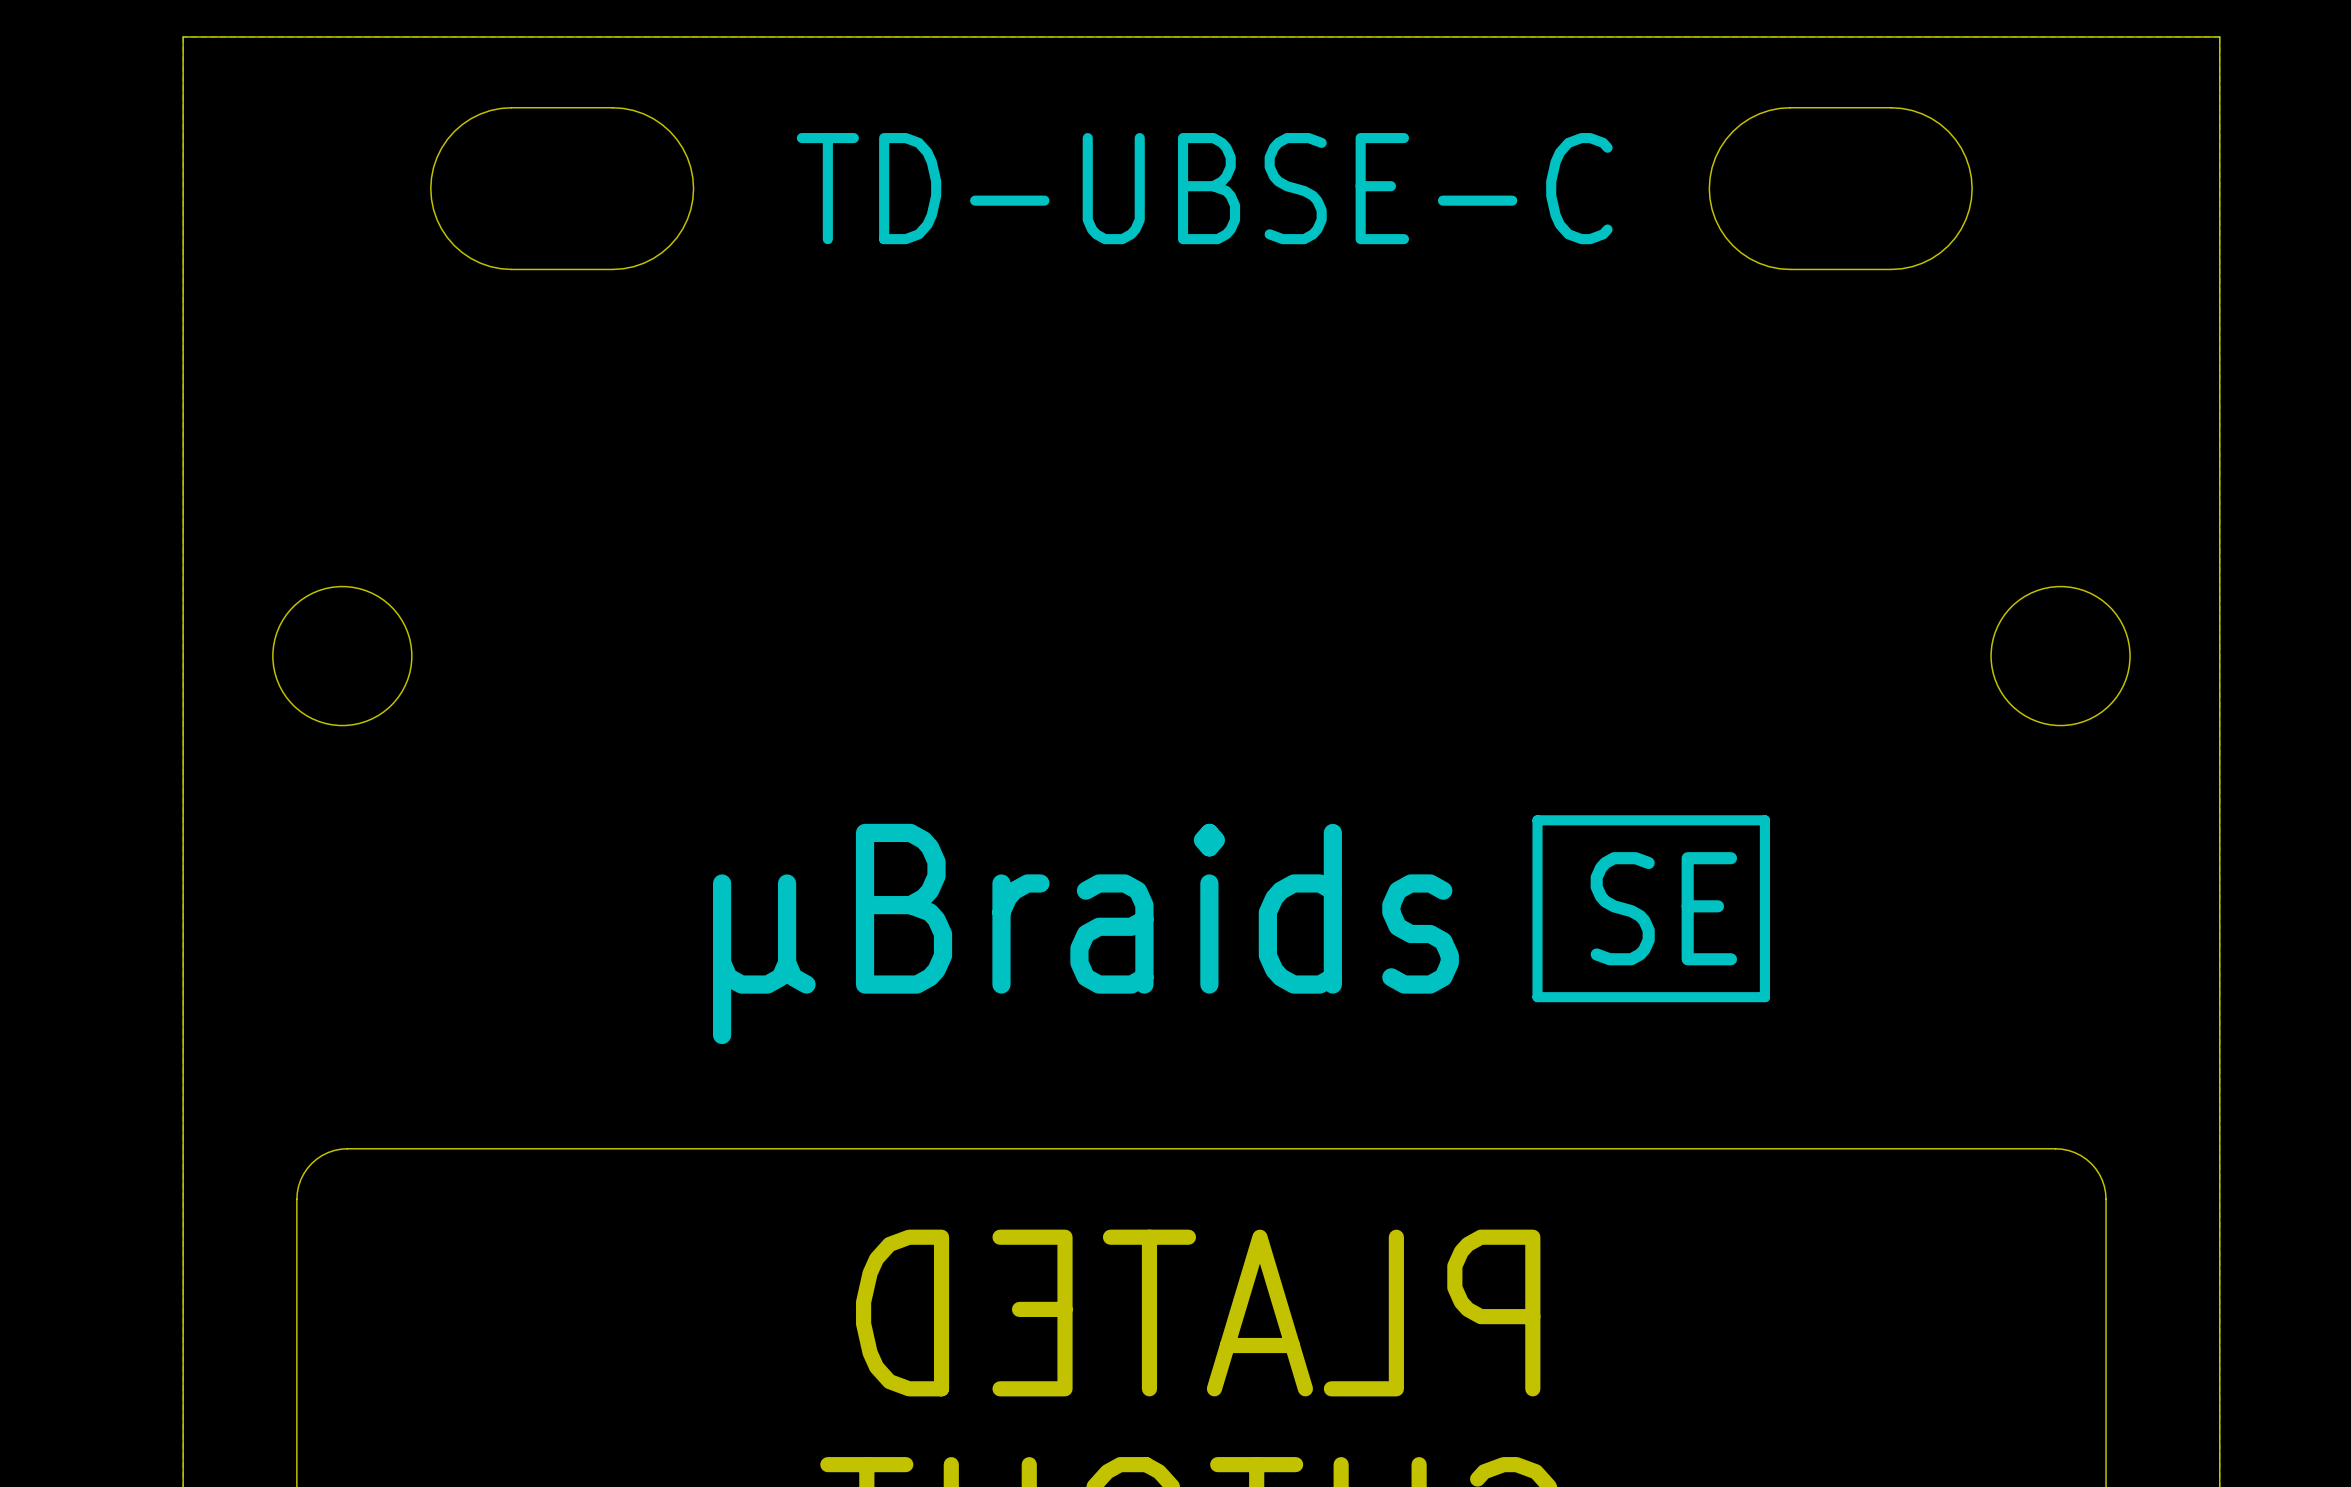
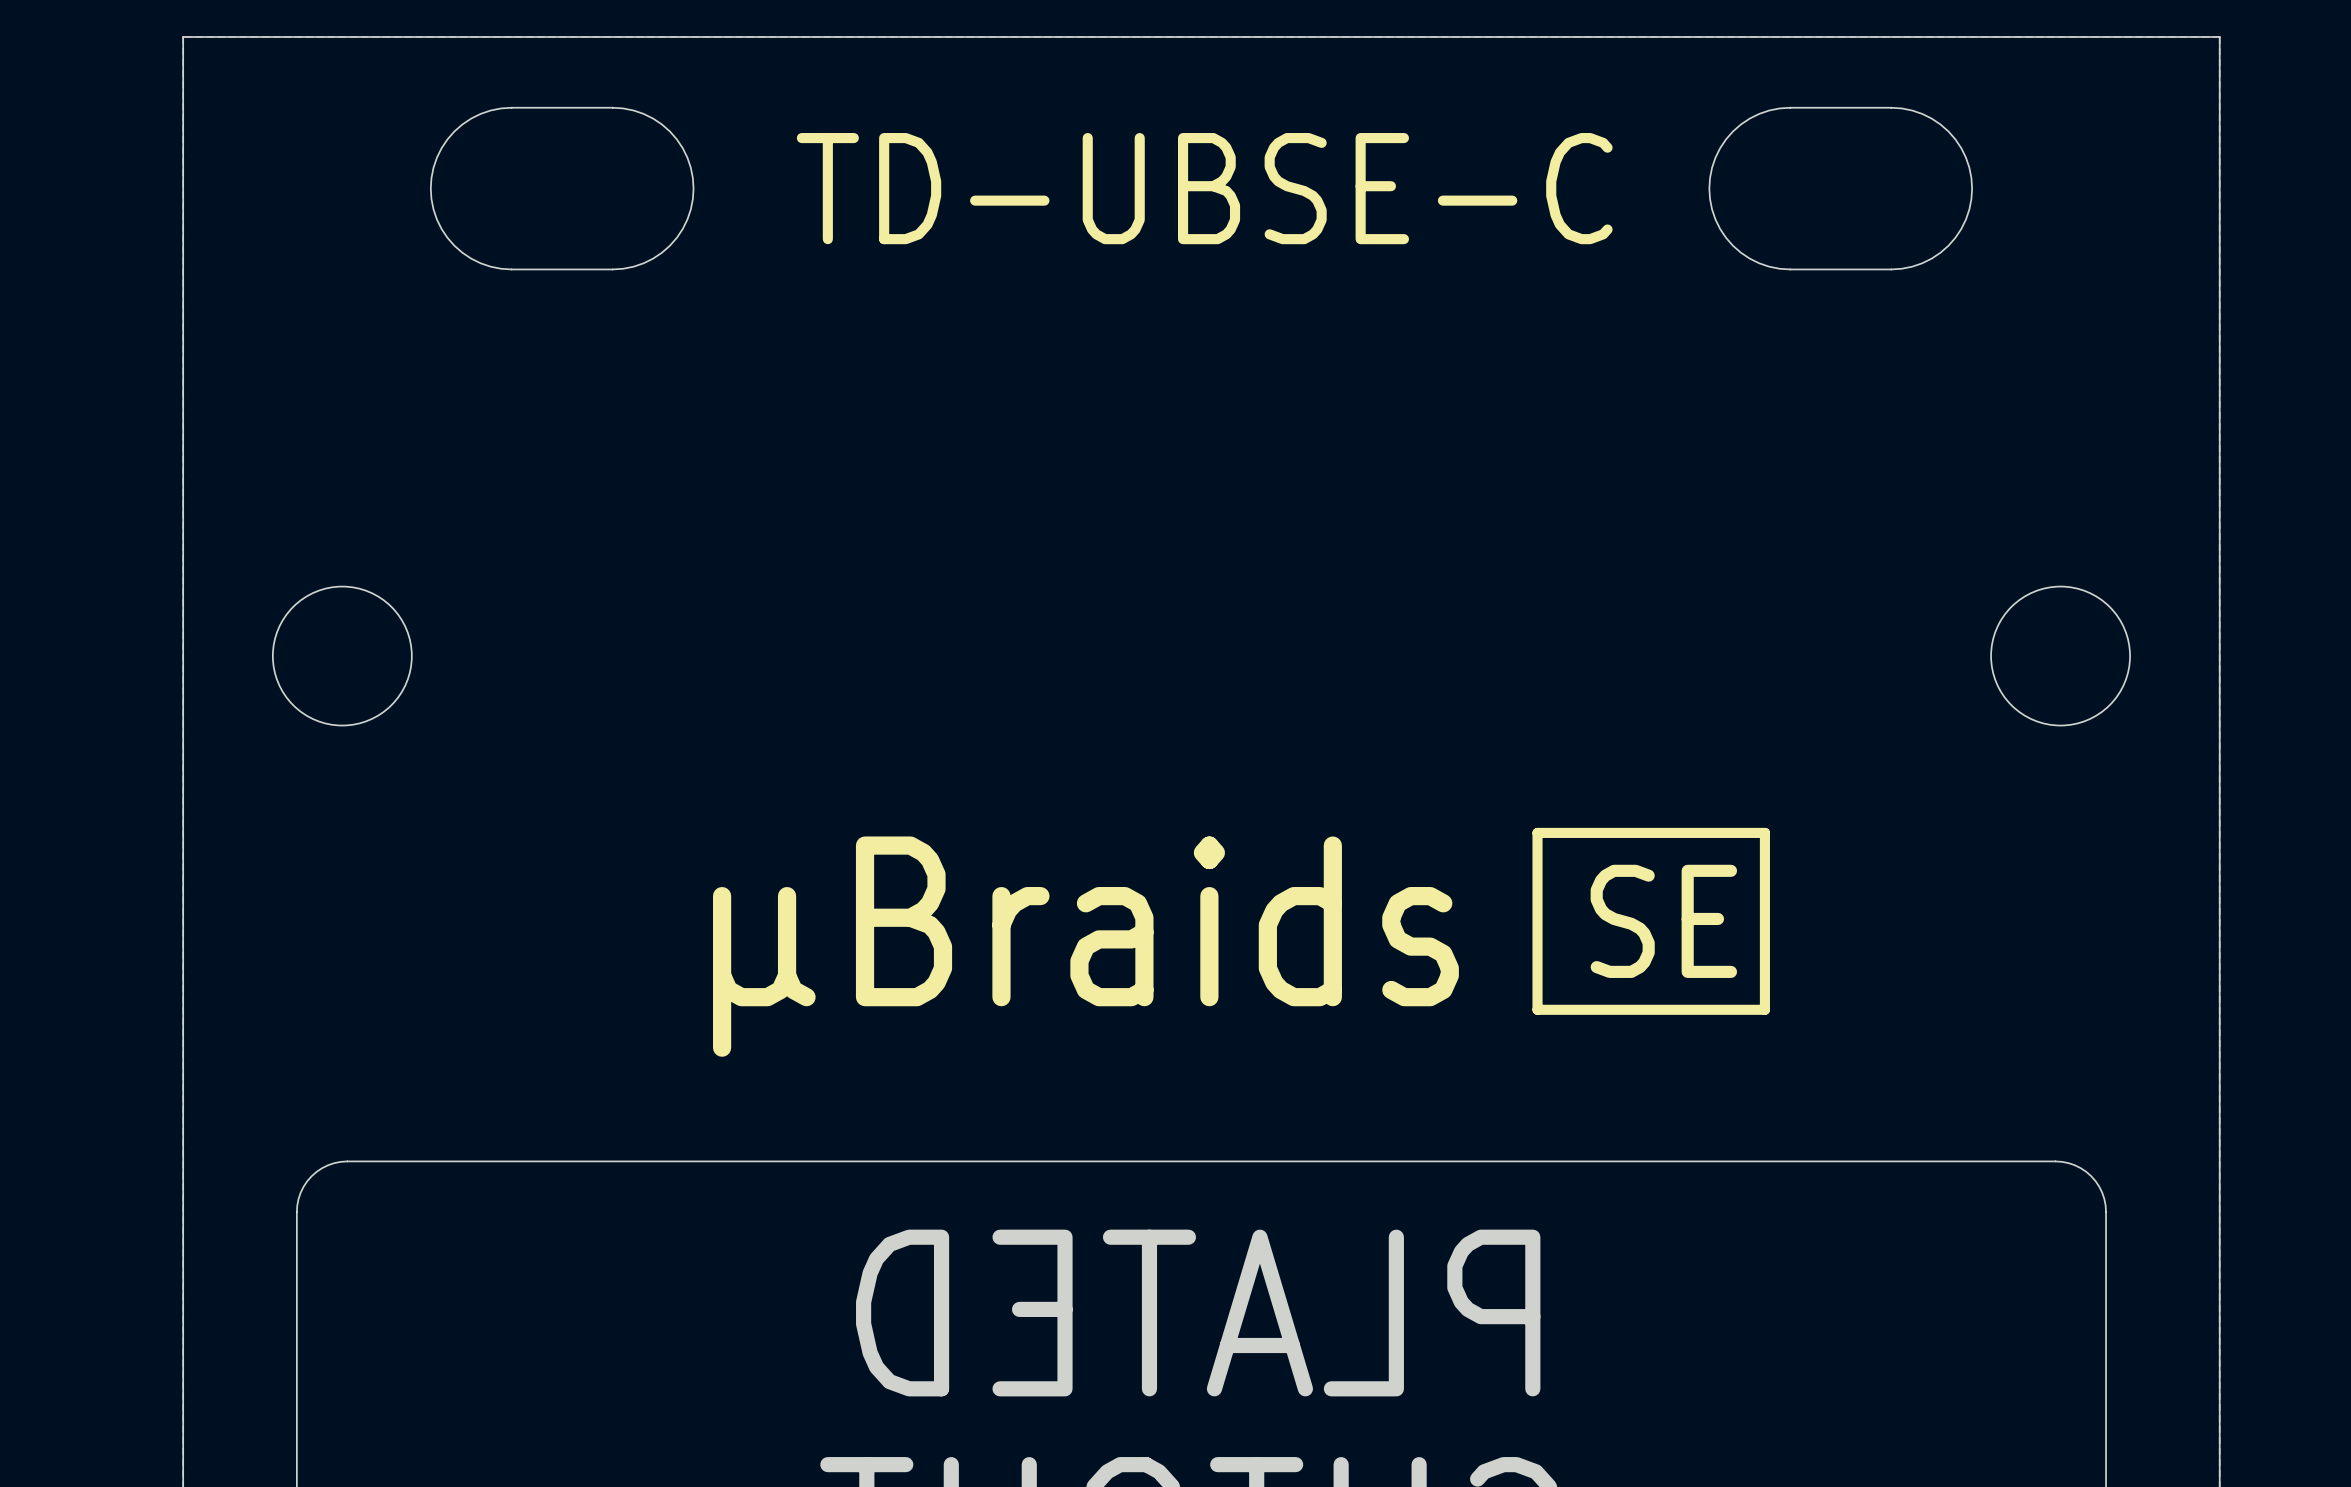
drawing position: (1651, 908) -> (1651, 921)
board edge: (2106, 1211) (2104, 1186) (2095, 1168) (2086, 1159) (2074, 1152) (2055, 1148) (347, 1148) (328, 1152) (316, 1159) (307, 1168) (298, 1186) (296, 1211) -> (2106, 1211) (2102, 1192) (2091, 1176) (2074, 1165) (2055, 1161) (347, 1161) (328, 1165) (311, 1176) (300, 1192) (296, 1211)

